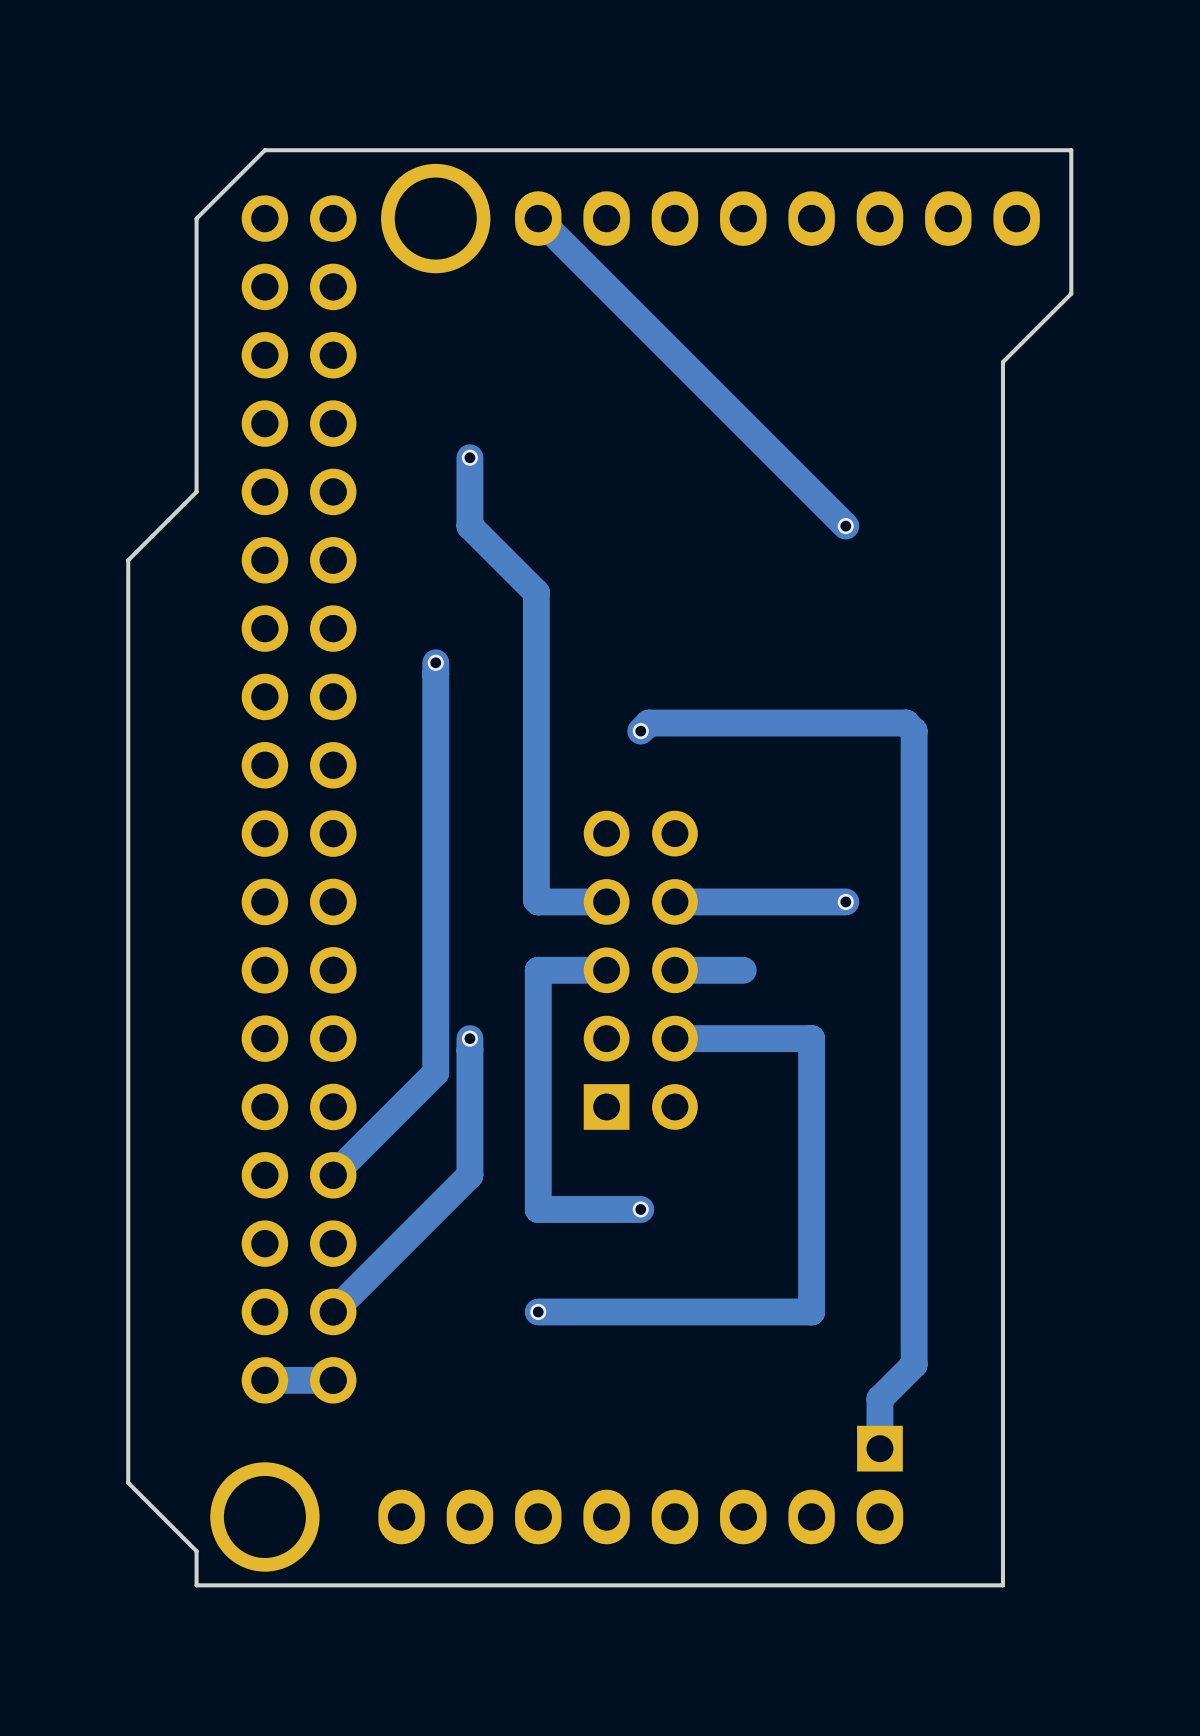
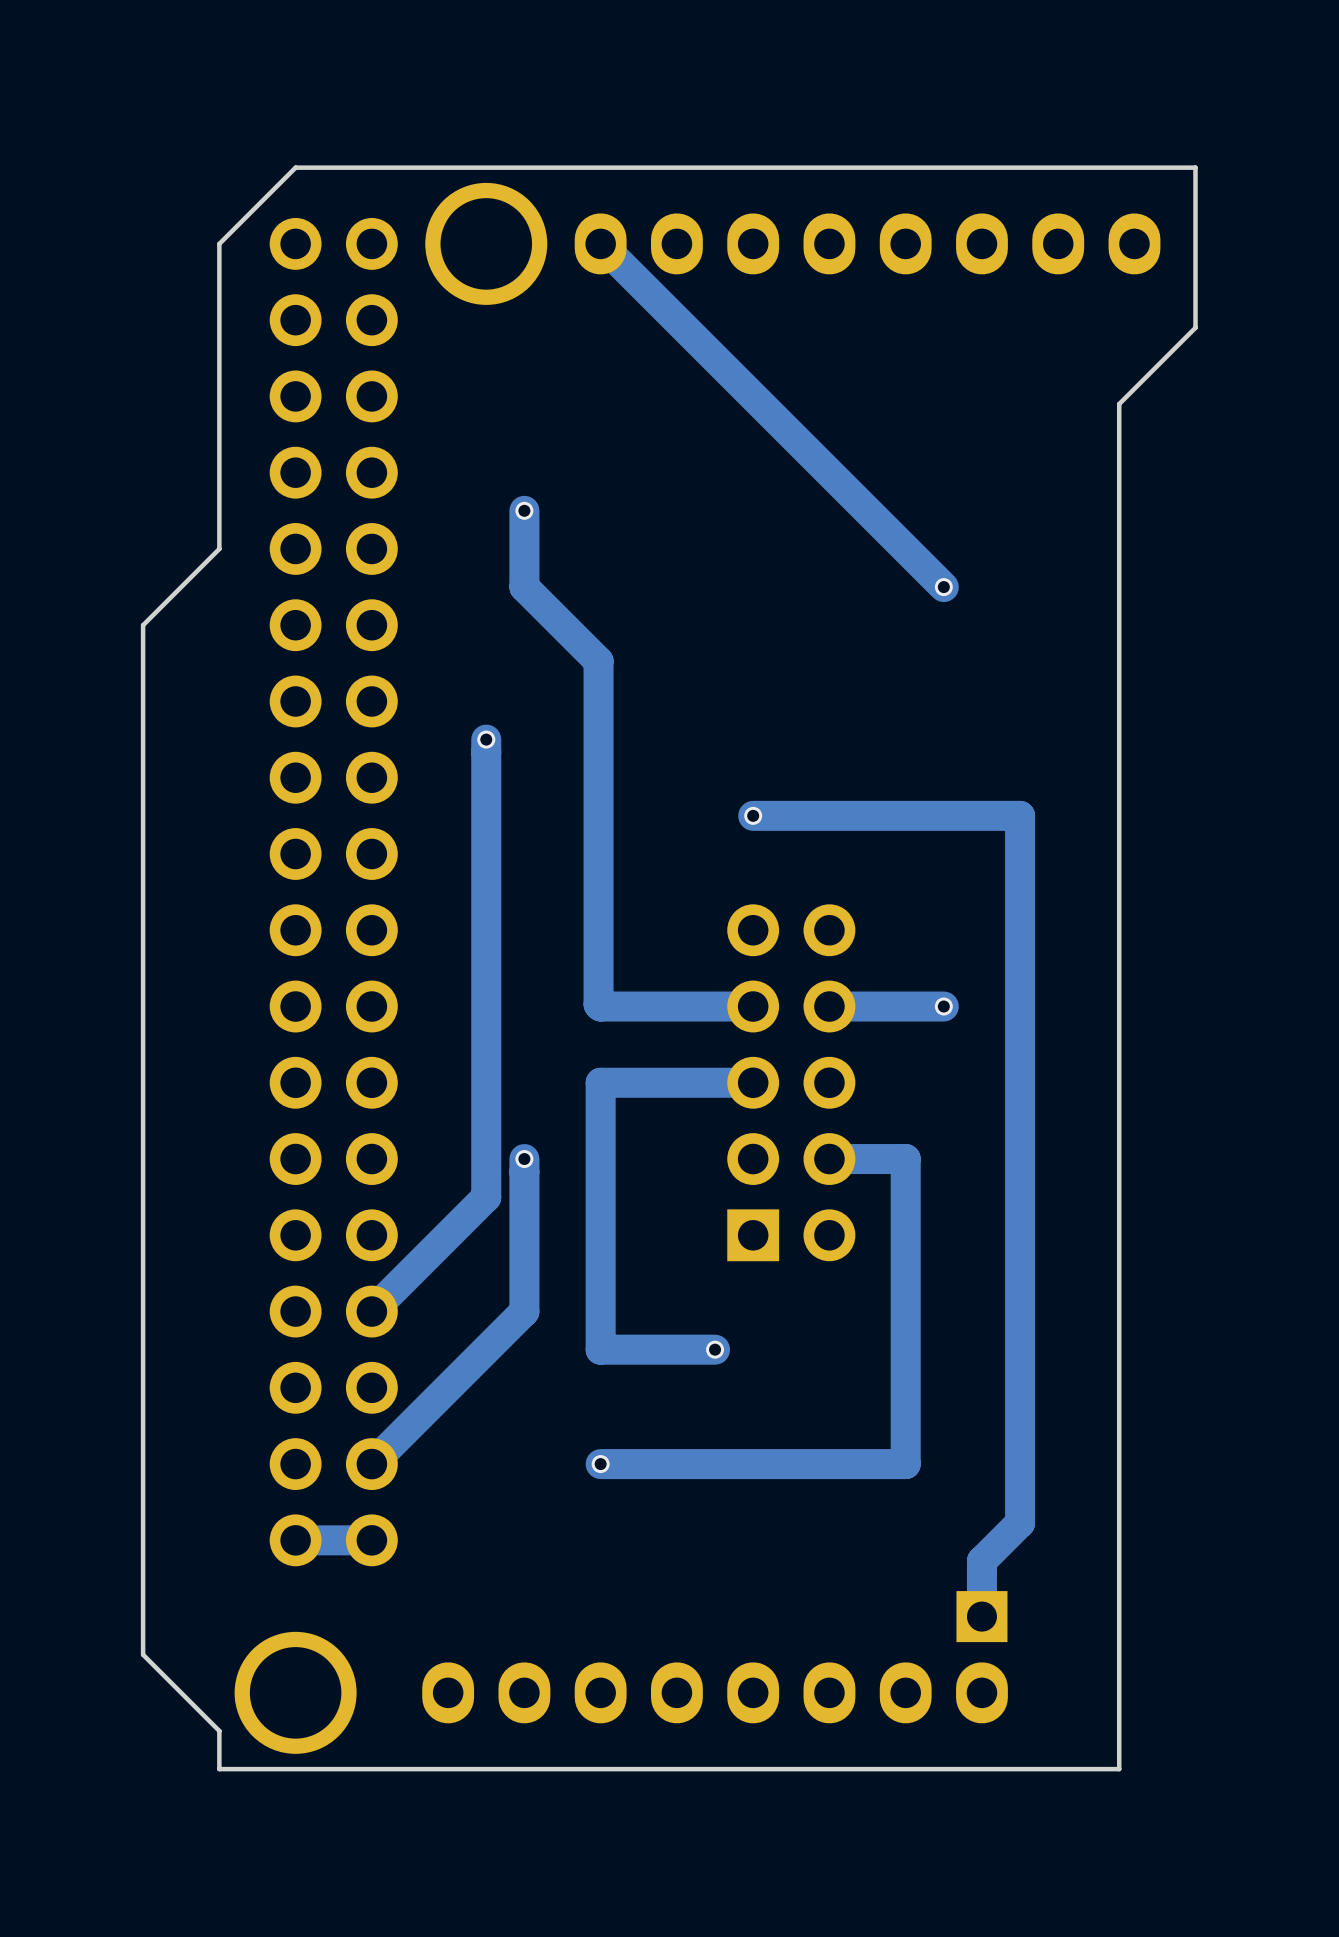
via position: (640, 731) -> (753, 815)
track: (914, 731) (906, 723) (648, 723) (640, 731) -> (1020, 815) (753, 815)
track: (743, 901) (674, 901) -> (676, 1006) (753, 1006)
part: (640, 970) -> none
part: none -> (791, 1082)
track: (743, 970) (674, 970) -> (676, 1082) (753, 1082)
track: (743, 1038) (674, 1038) -> none

